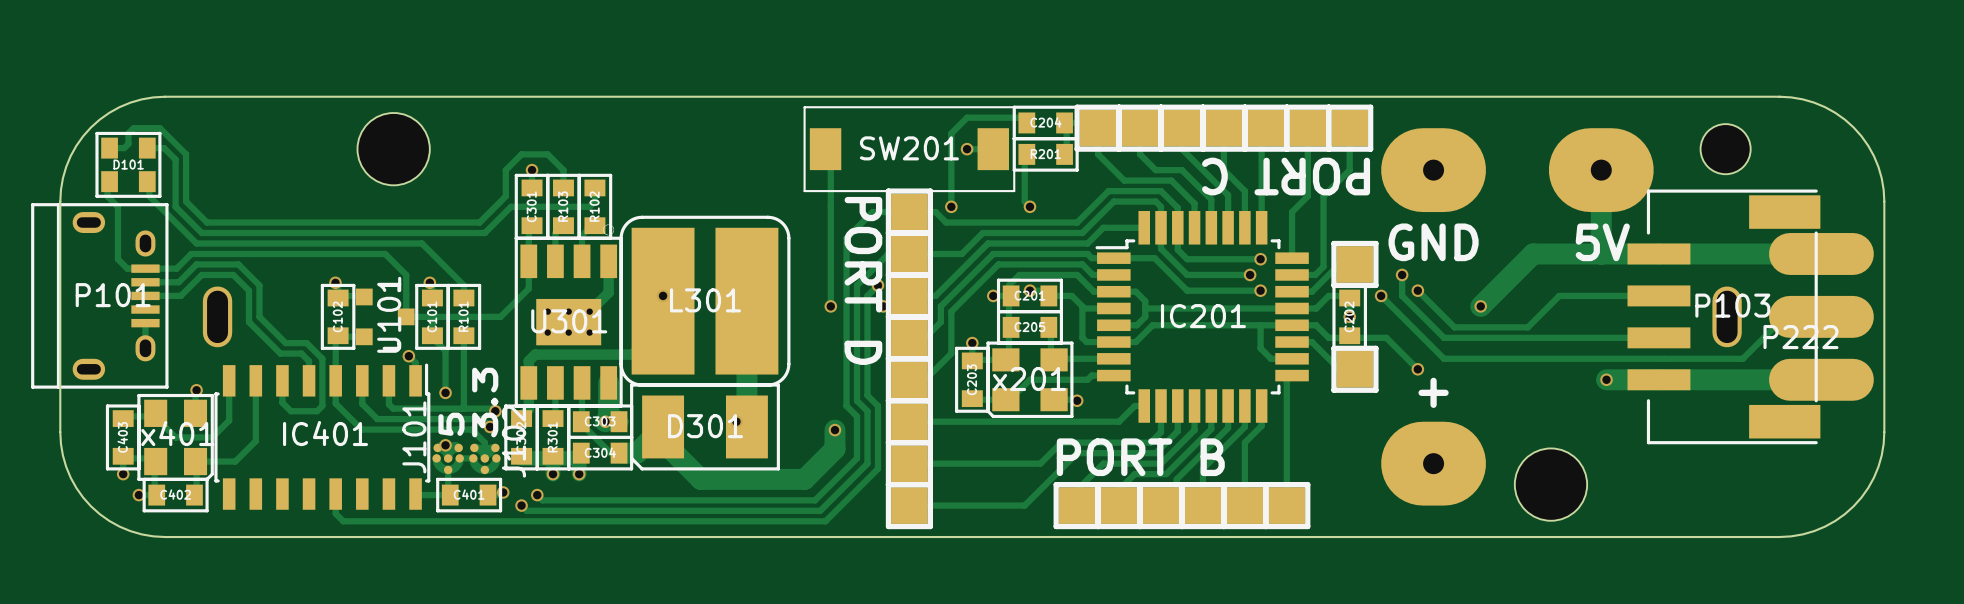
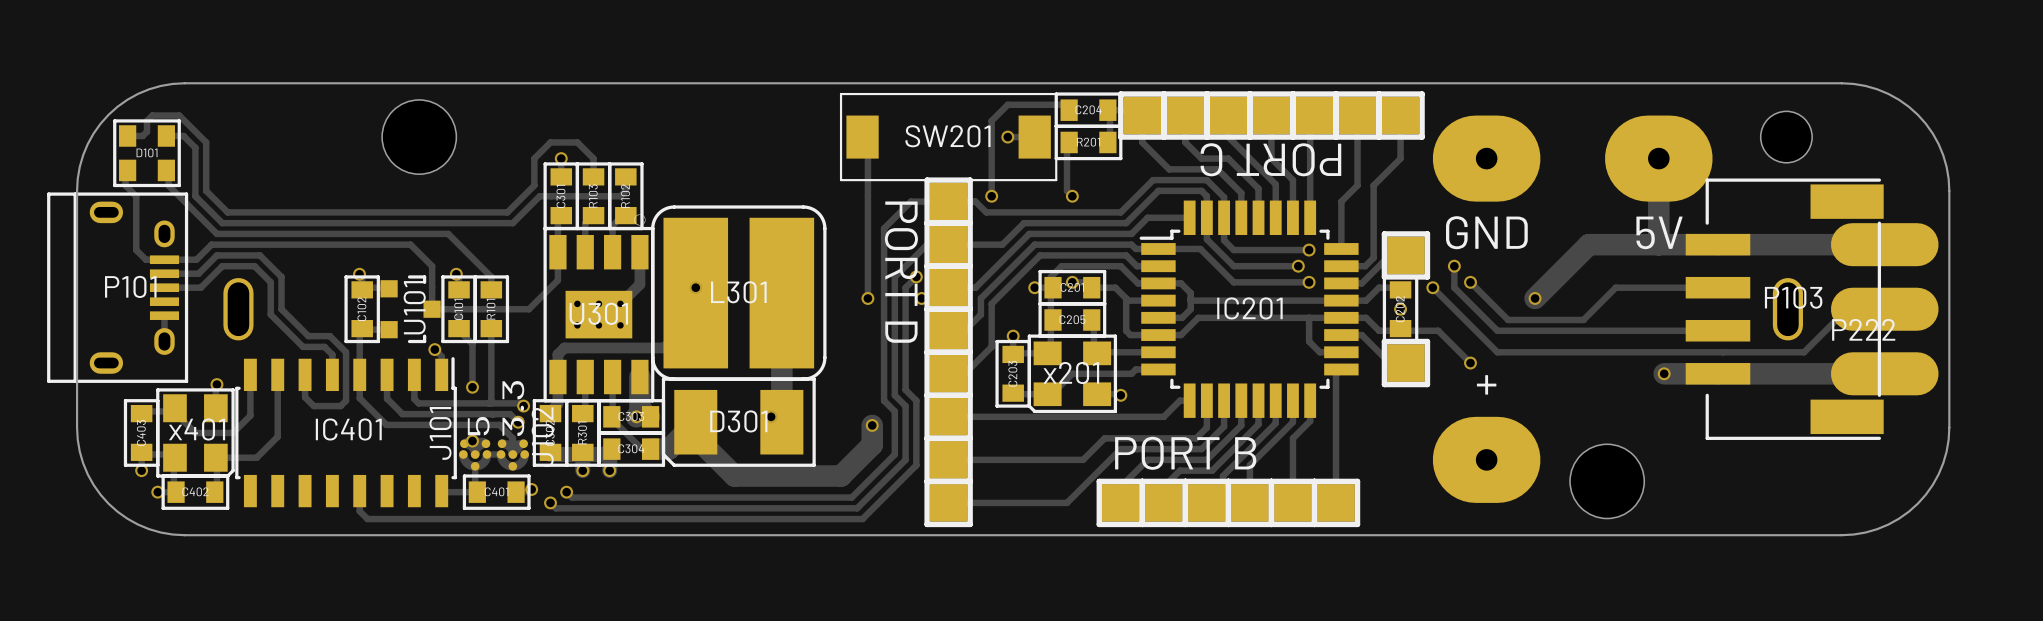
text position: PORT C (1286, 176) -> PORT C (1270, 159)

